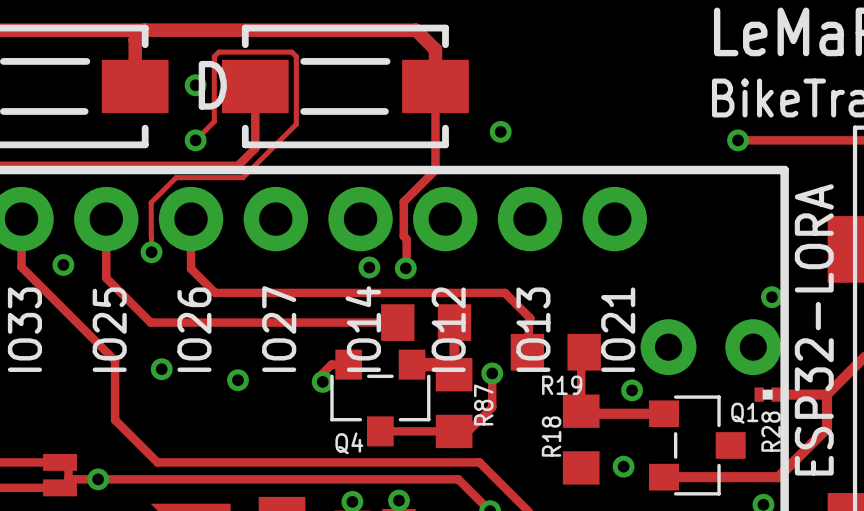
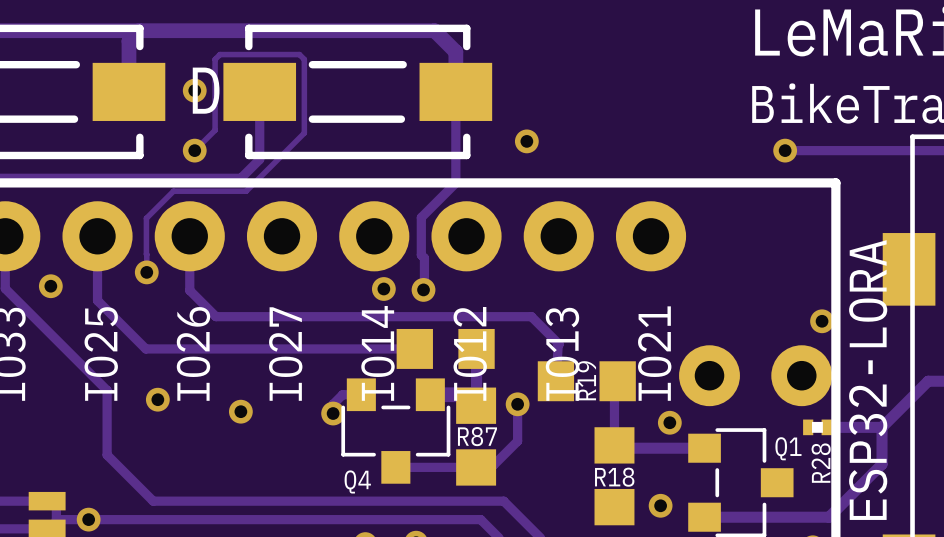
R19 name rotation: 0° (562, 385) -> 90° counterclockwise (586, 380)
R87 name rotation: 0° (483, 405) -> 90° clockwise (477, 436)
R18 name rotation: 0° (551, 436) -> 90° clockwise (614, 477)

